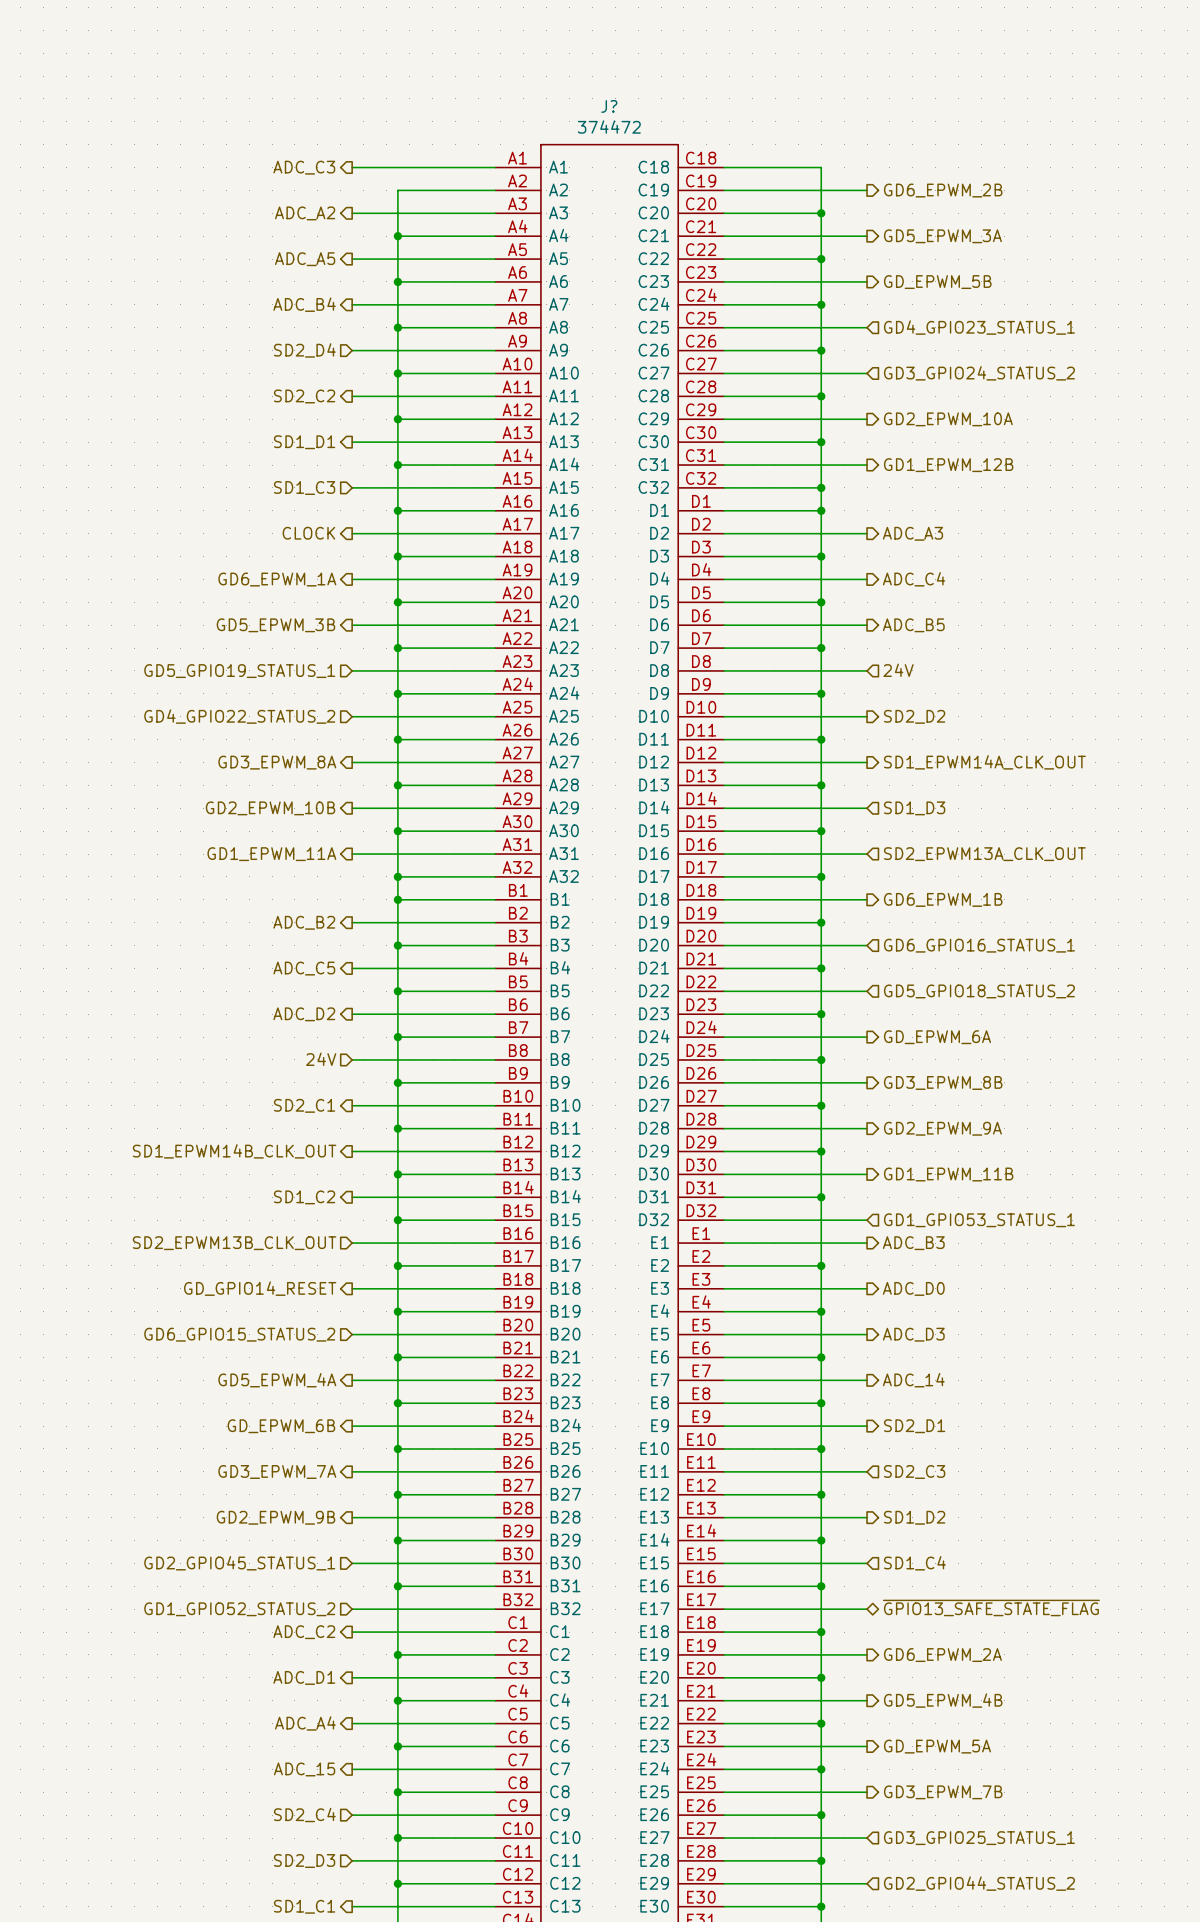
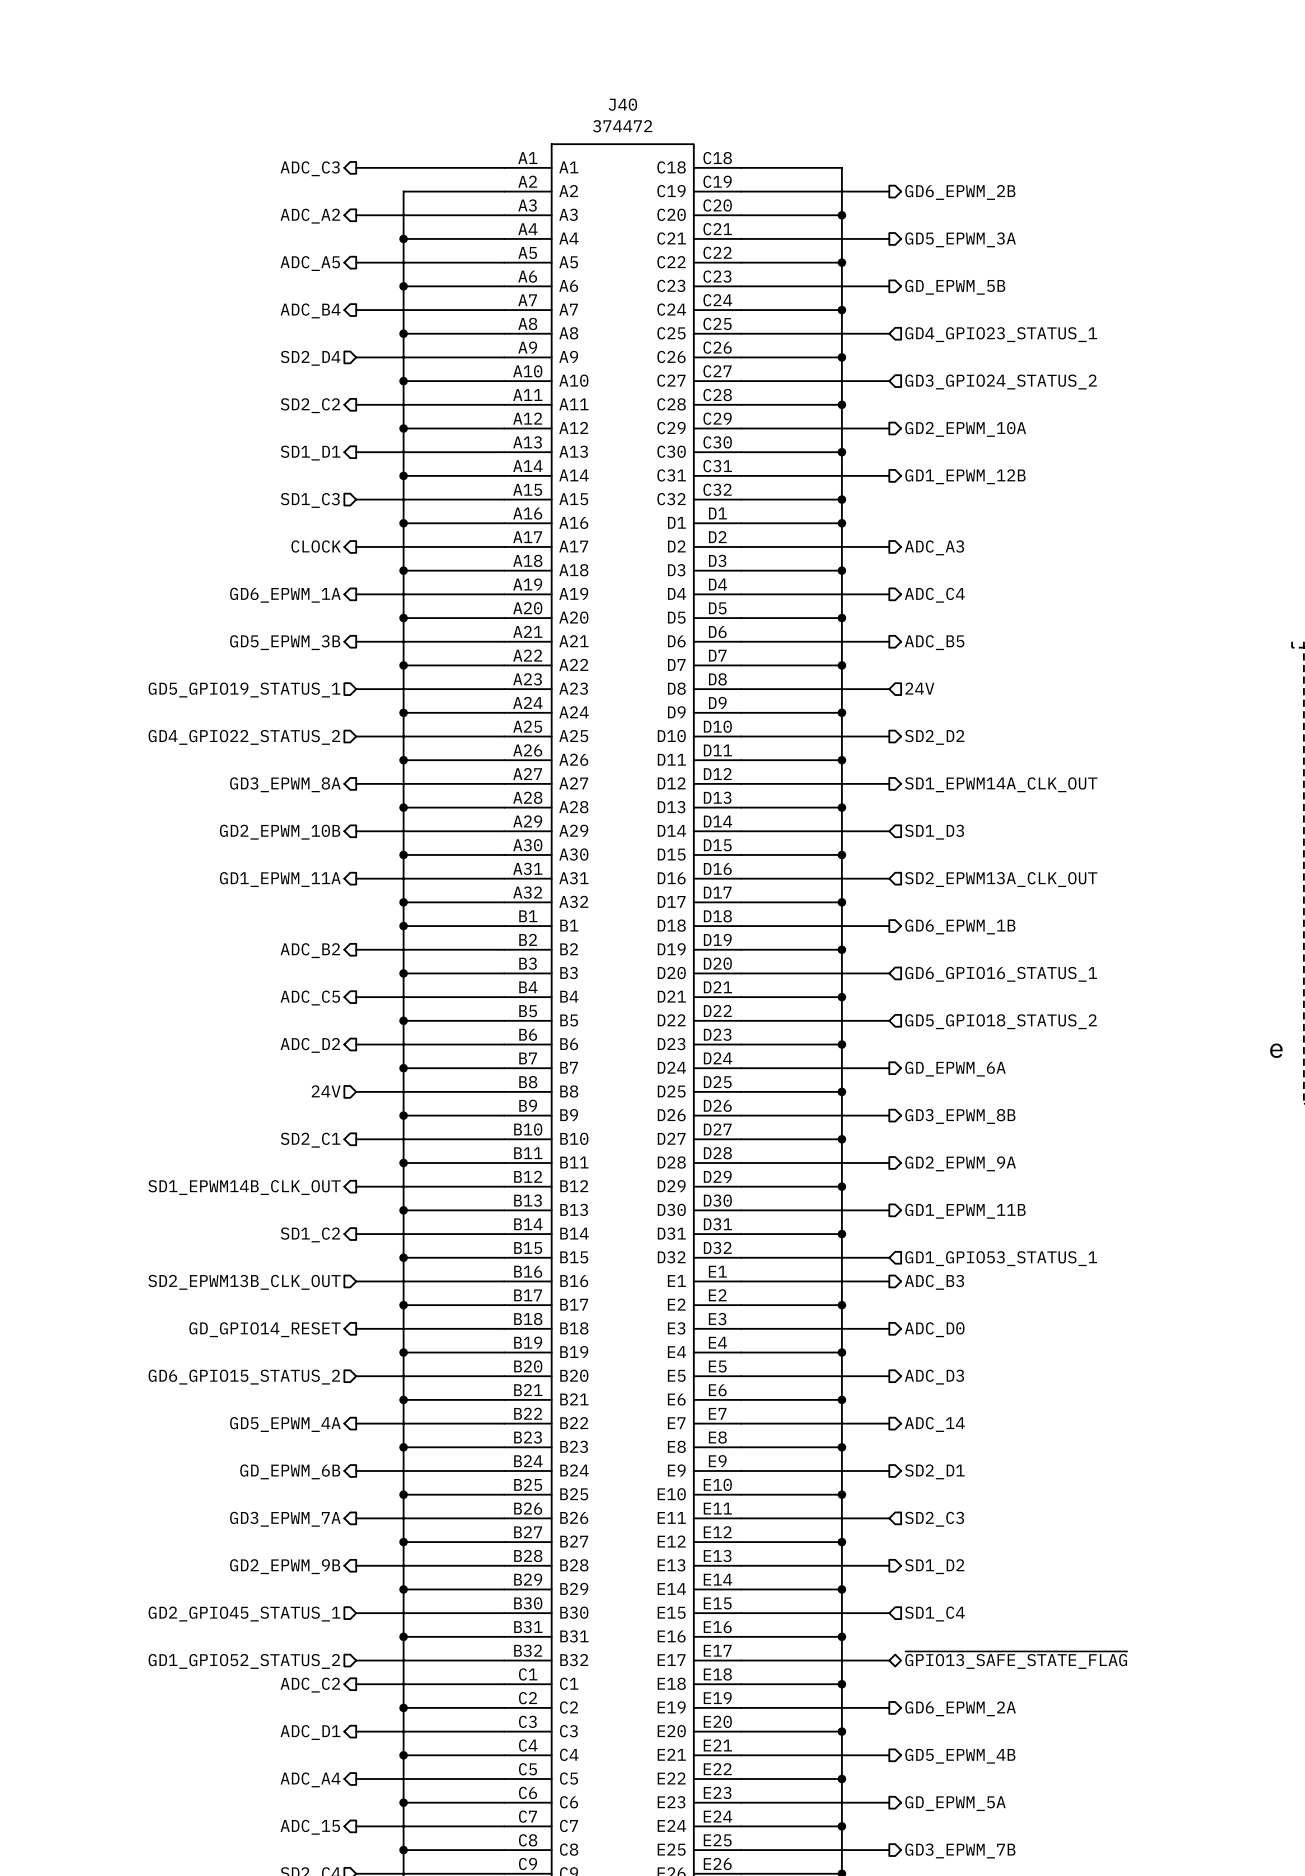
J? name: J? (609, 106) -> J40 (622, 104)

